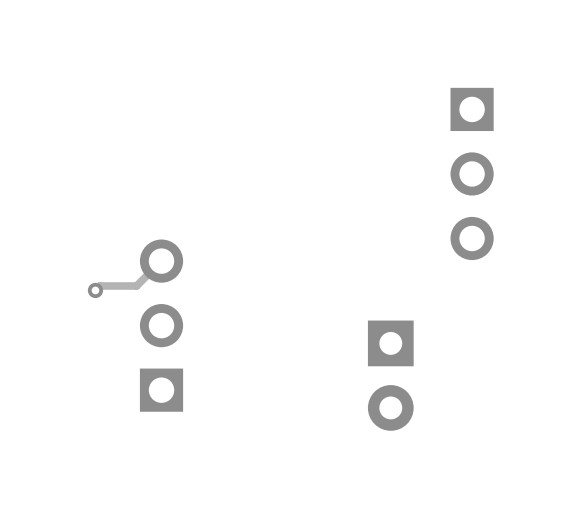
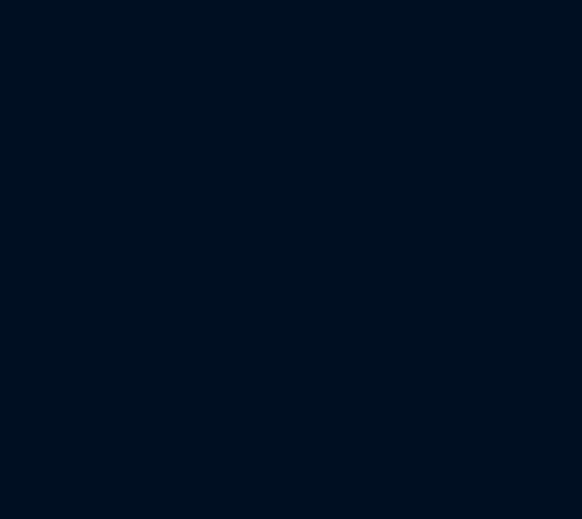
part: (472, 173) -> none
track: (161, 261) (136, 286) (99, 286) (95, 290) -> none
via: (95, 290) -> none
part: (161, 325) -> none
part: (390, 375) -> none

